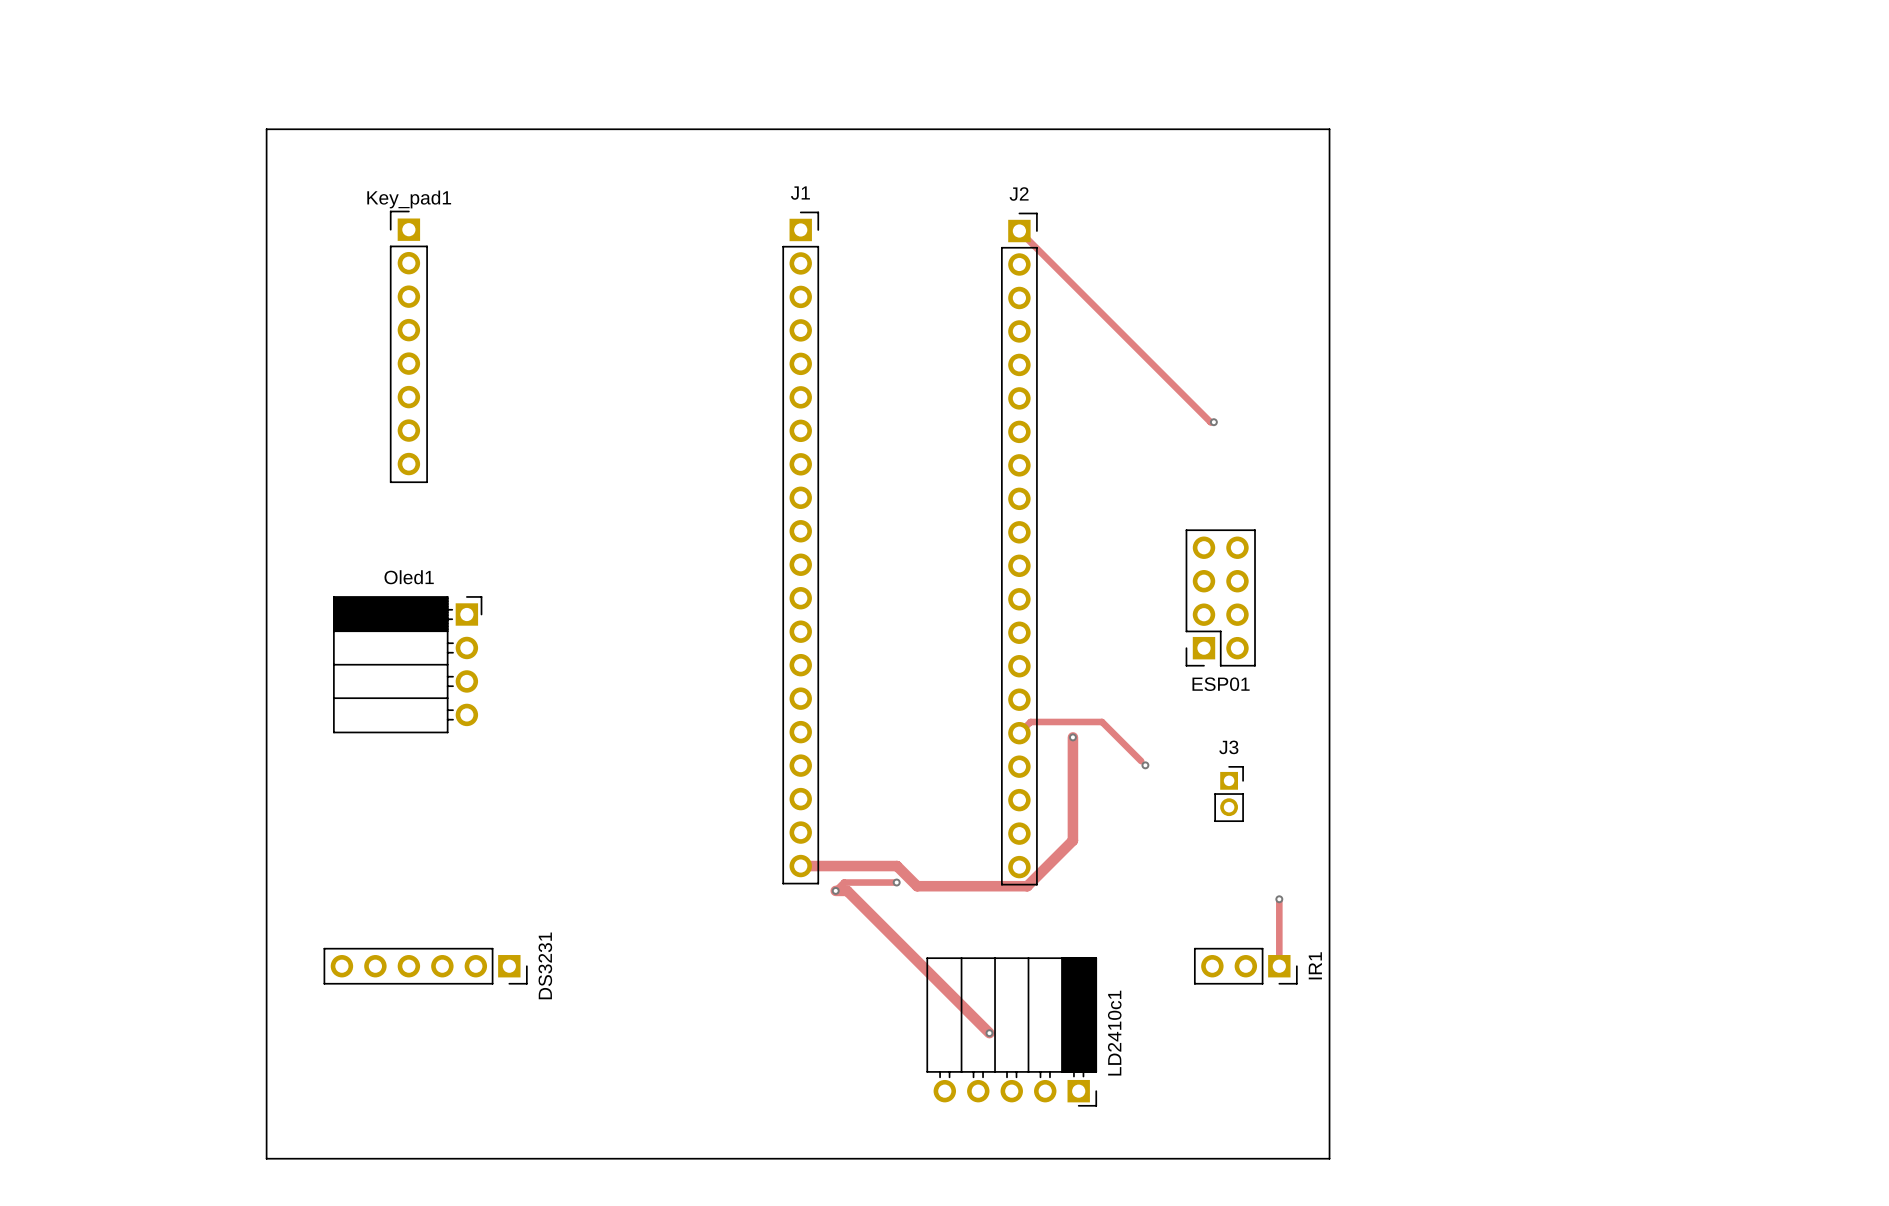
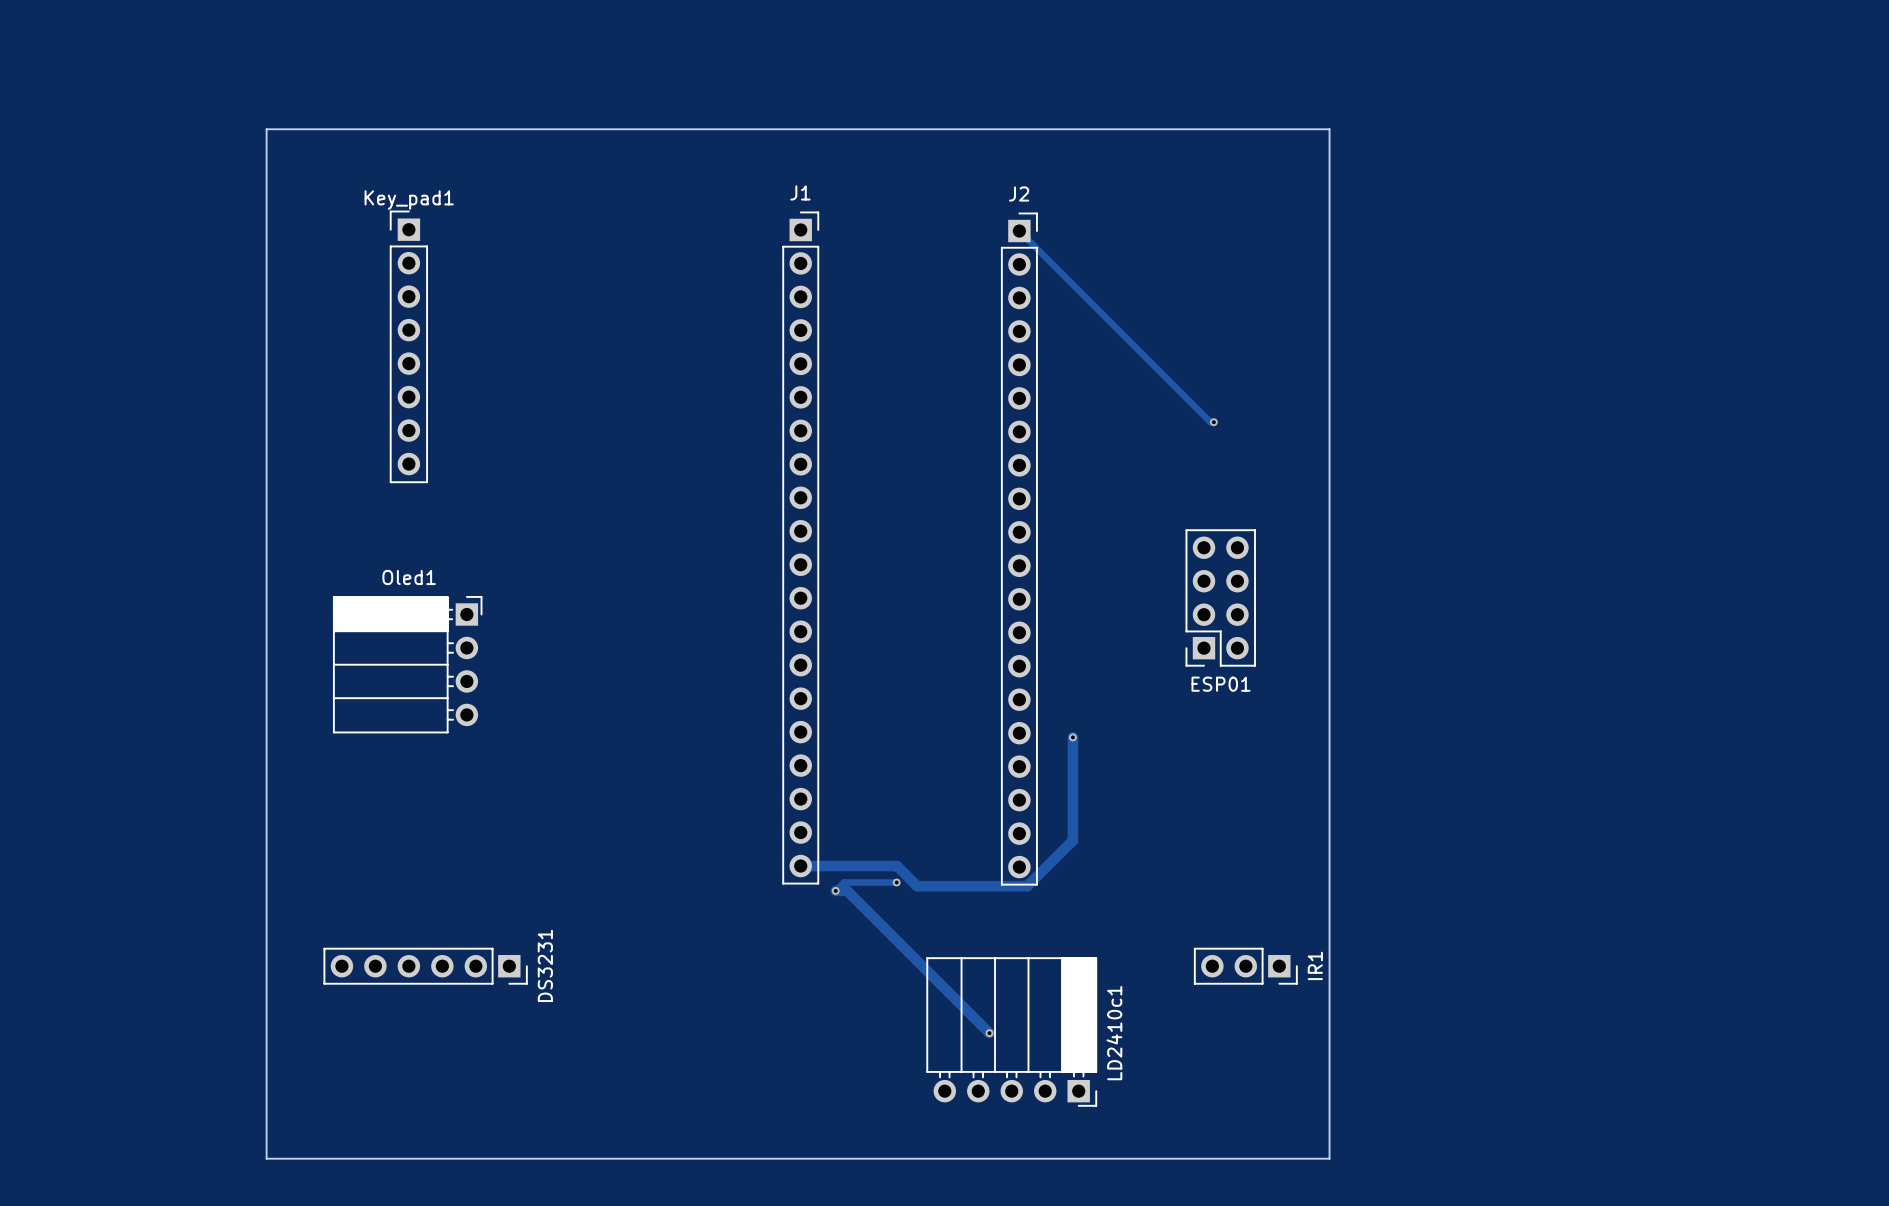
track: (1019, 733) (1030, 721) (1102, 721) (1141, 761) -> none
via: (1145, 765) -> none
J3: (1229, 794) -> none
track: (1279, 899) (1279, 966) -> none
via: (1279, 899) -> none

